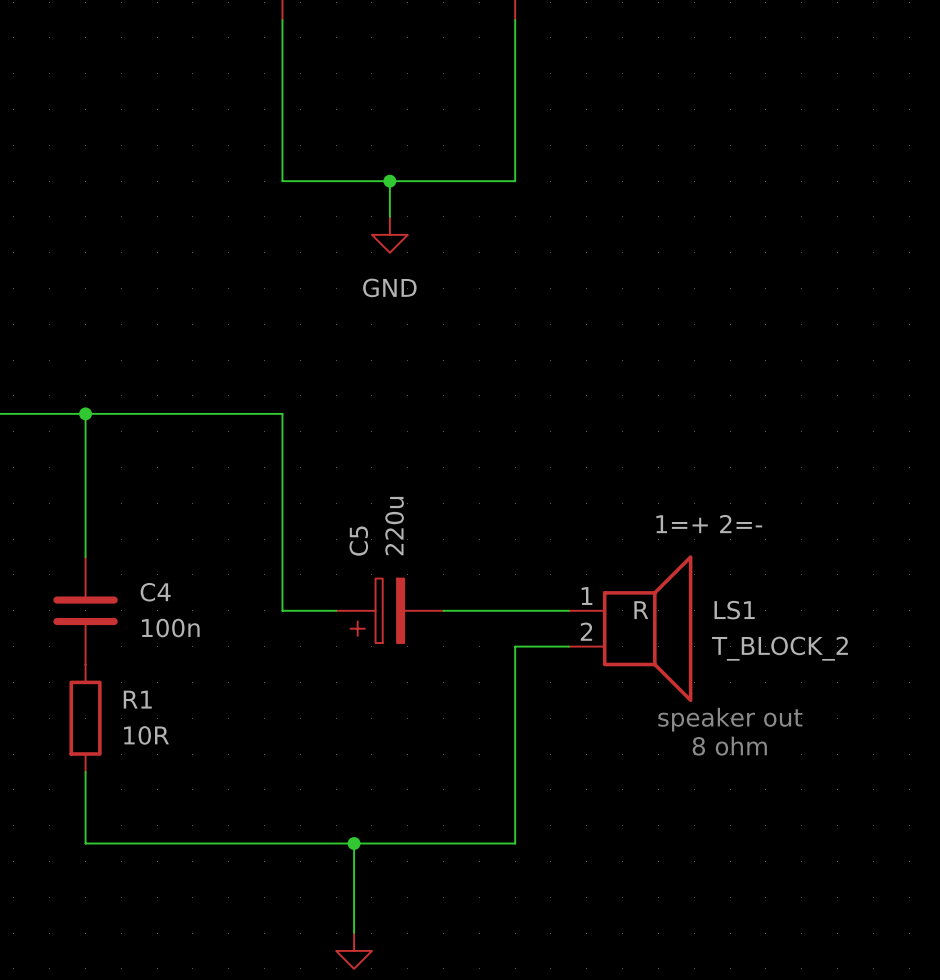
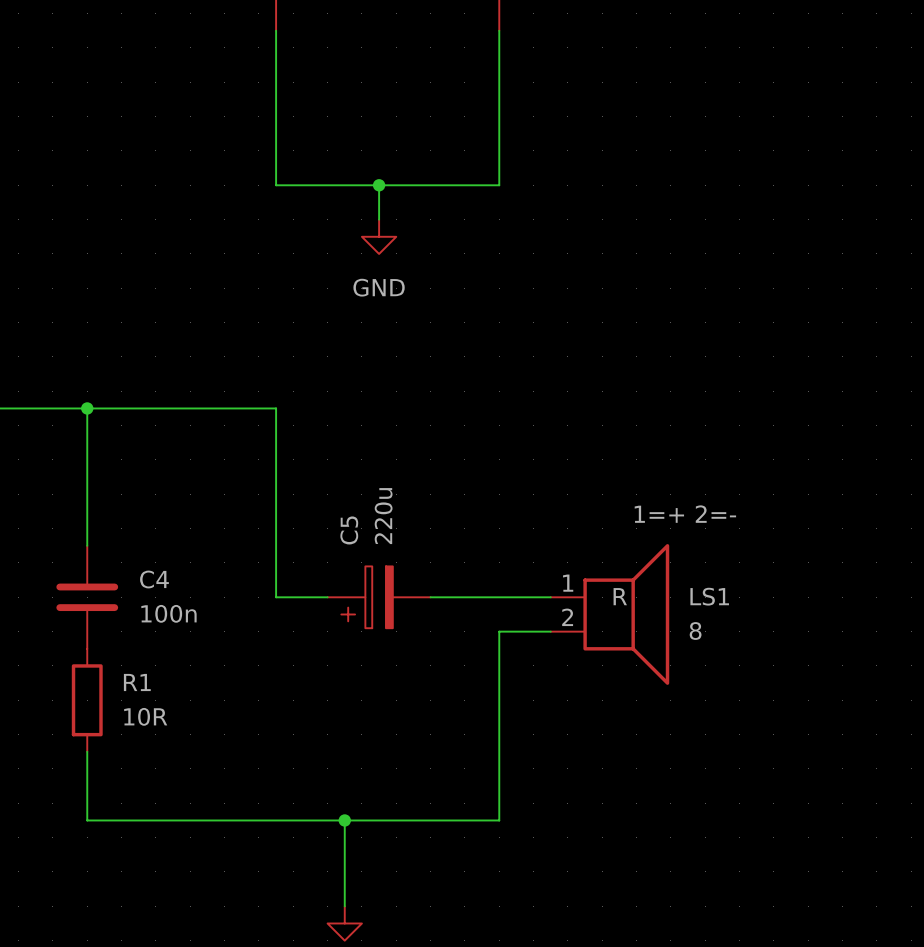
LS1 value: T_BLOCK_2 (779, 648) -> 8 (695, 631)
text: speaker out (730, 719) -> none
text: 8 ohm (729, 746) -> none

